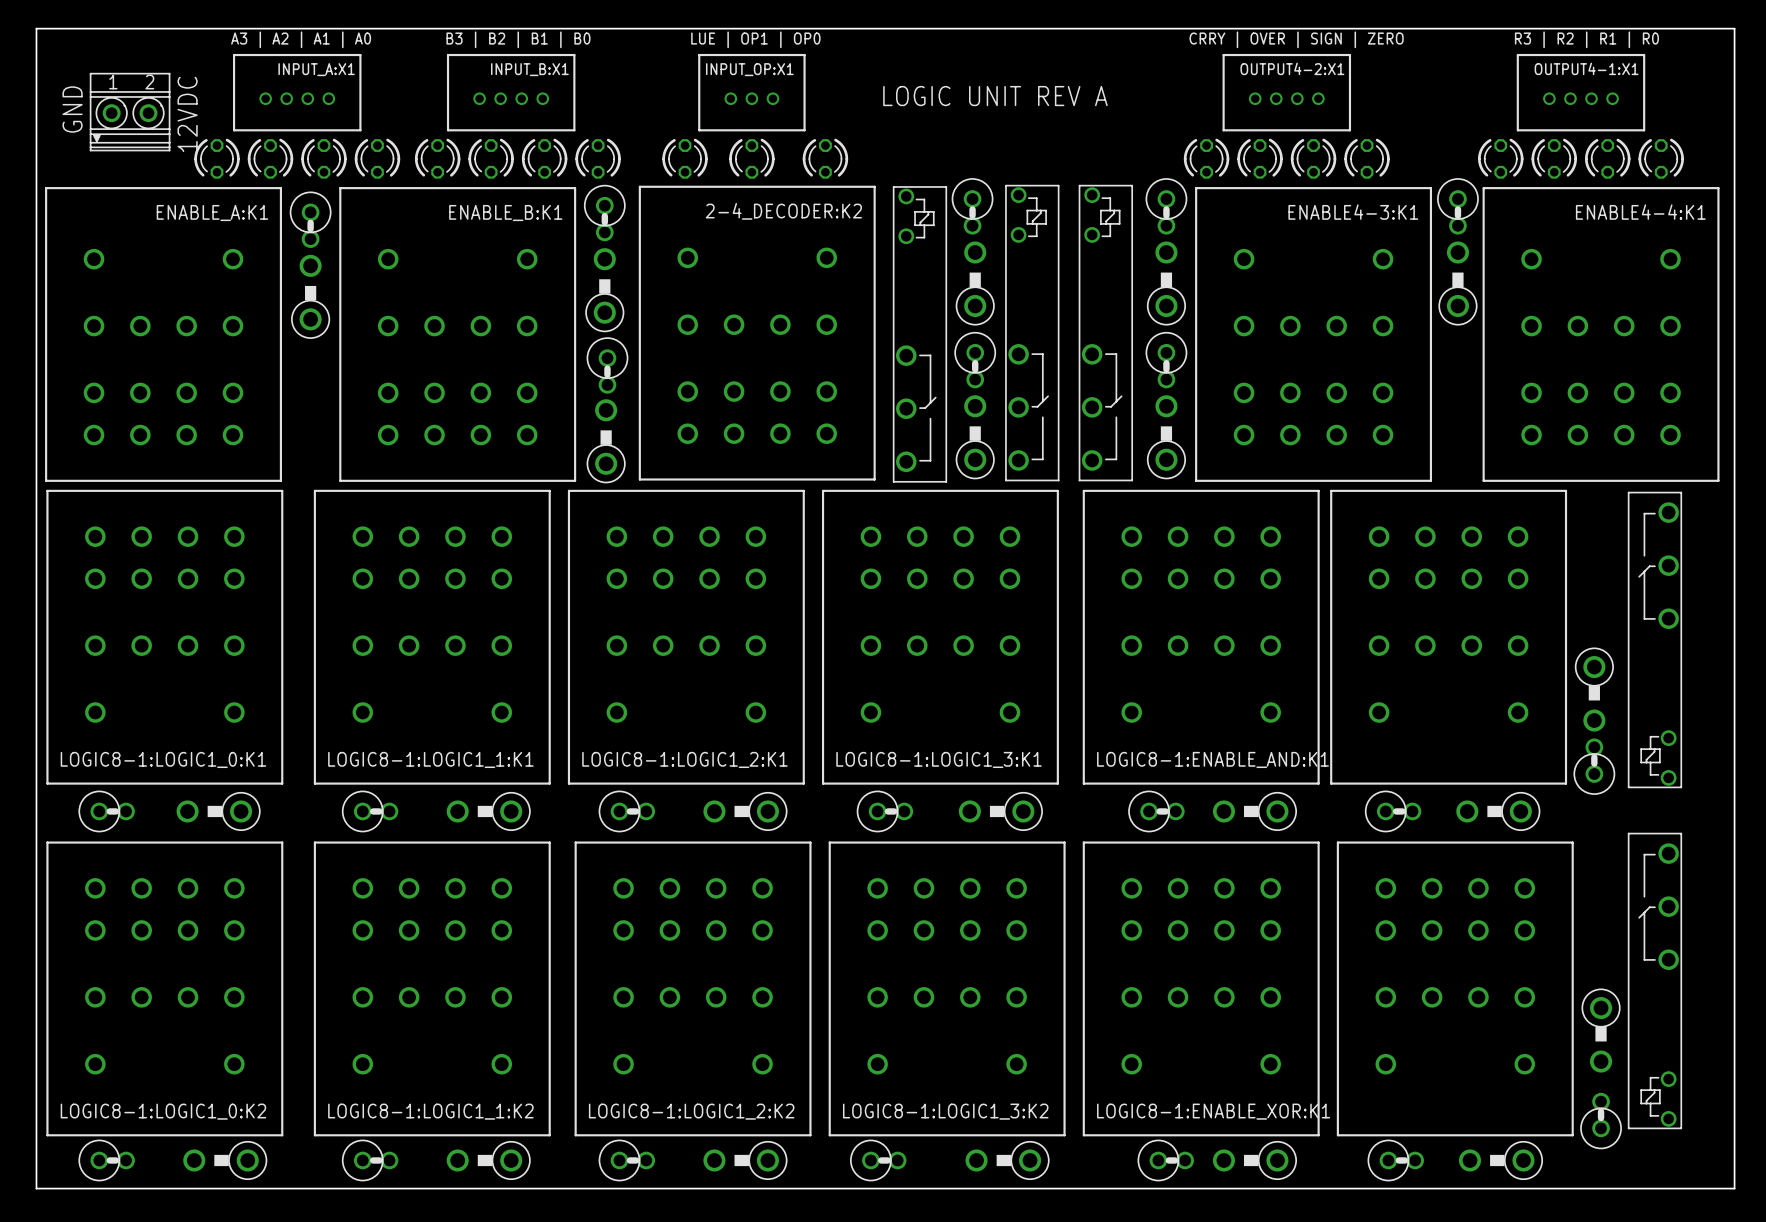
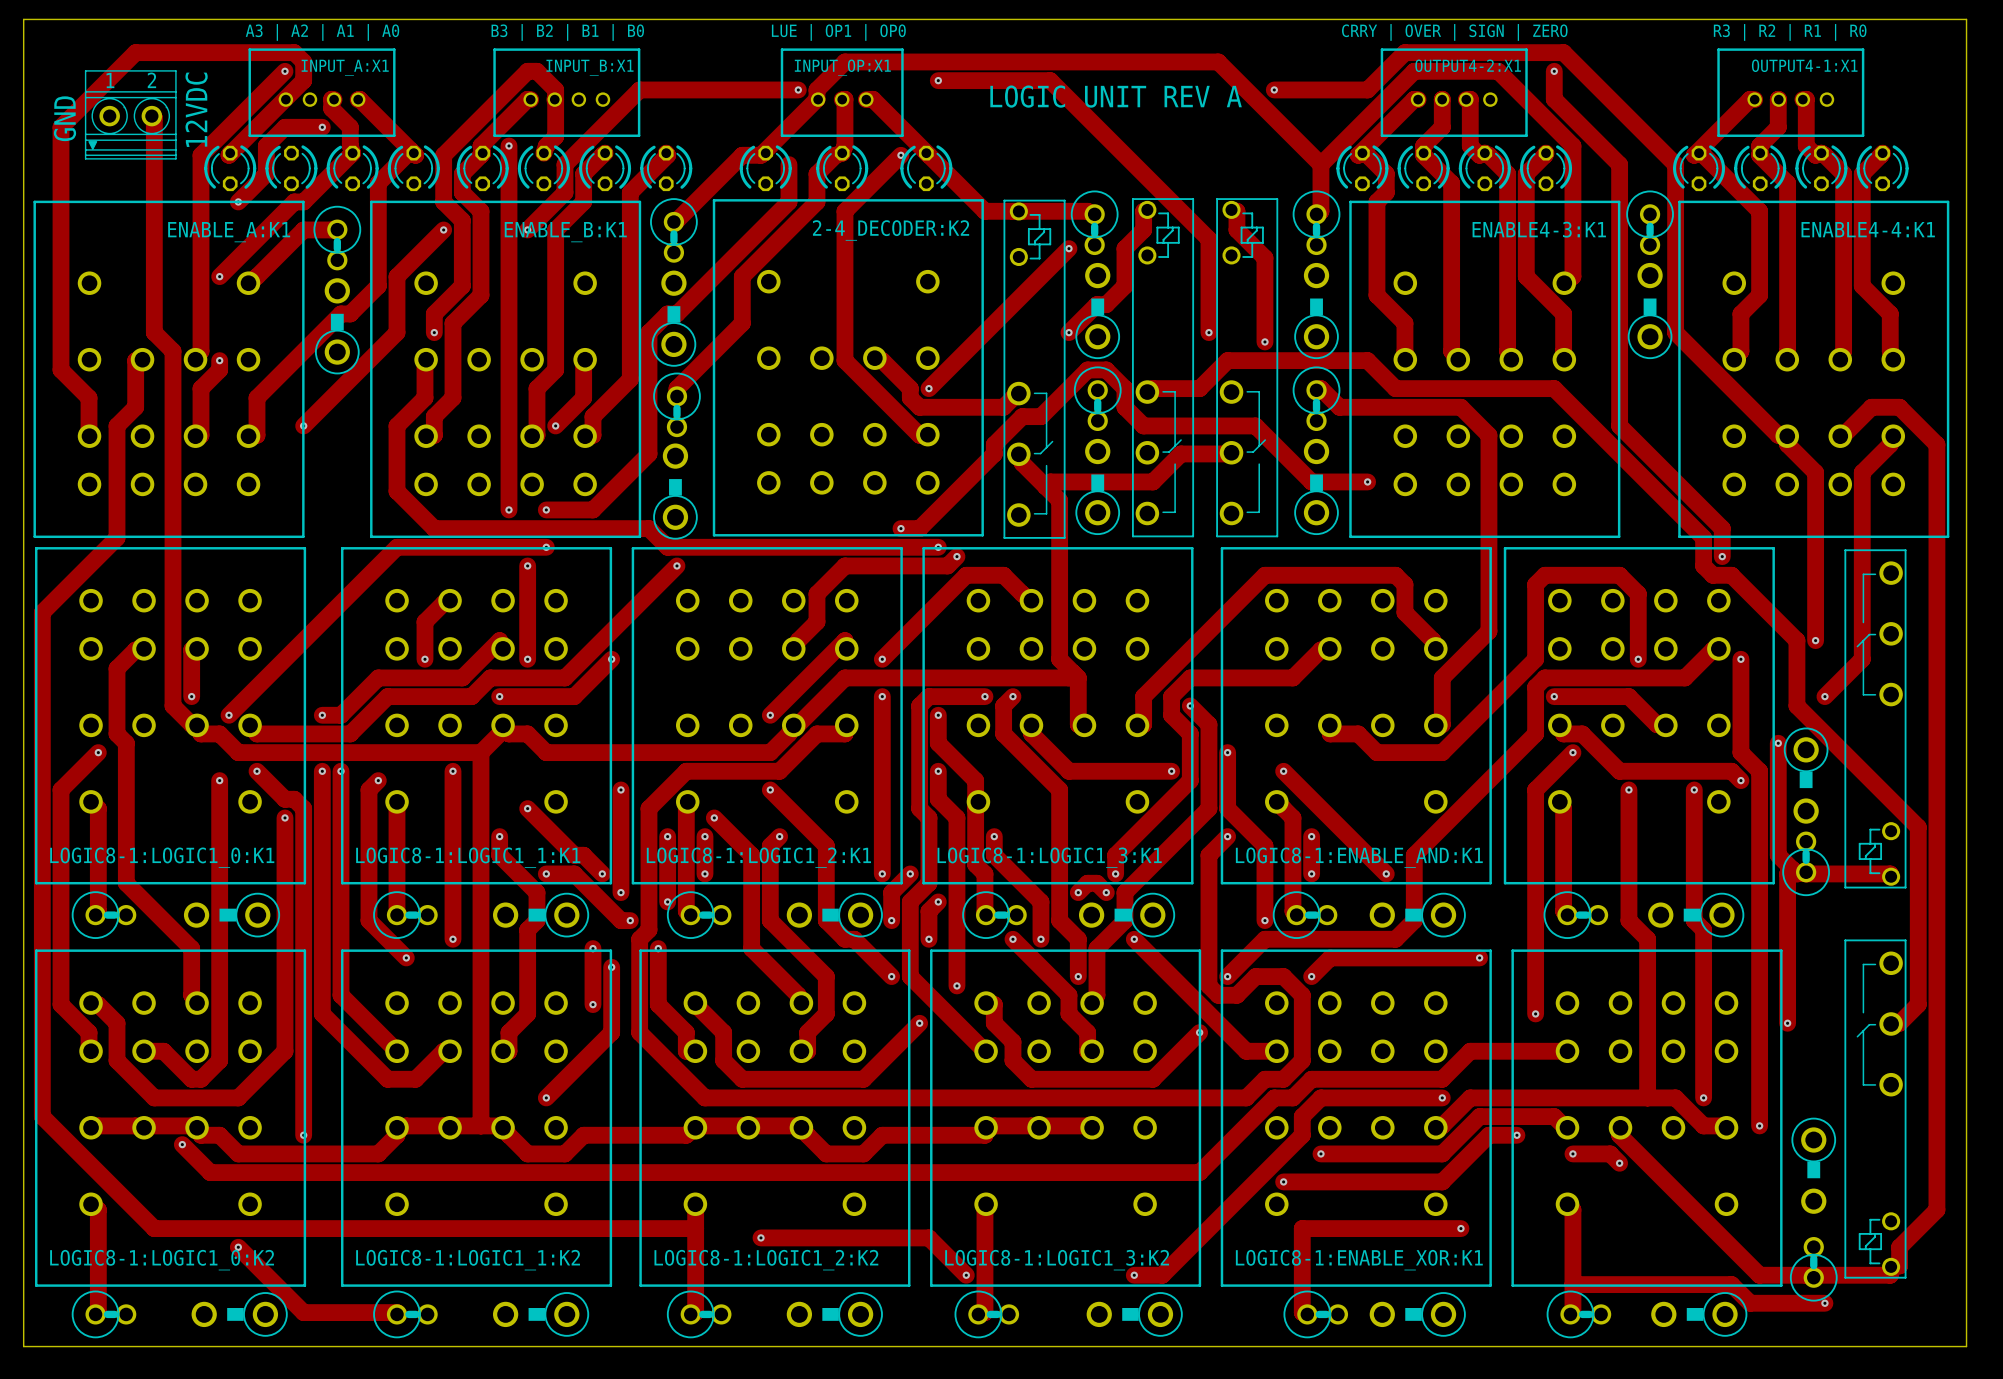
track: none -> (285, 71) (201, 155) (201, 351) (195, 359)
via: none -> (285, 71)
track: none -> (1554, 71) (1554, 99) (1619, 164) (1619, 425) (1722, 528) (1722, 556)
via: none -> (1554, 71)
track: none -> (938, 80) (1050, 80) (1208, 239) (1208, 332)
via: none -> (938, 80)
track: none -> (798, 89) (639, 89) (564, 164) (564, 192) (527, 229)
via: none -> (798, 89)
track: none -> (1274, 89) (1367, 89) (1404, 52) (1563, 52) (1675, 164) (1675, 332) (1778, 435) (1787, 436) (1787, 444) (1815, 472) (1815, 640)
via: none -> (1274, 89)
track: none -> (334, 99) (331, 99) (331, 108) (350, 127) (350, 145) (352, 153) (303, 201) (294, 201) (219, 276)
track: none -> (358, 99) (415, 155) (413, 153)
track: none -> (530, 99) (527, 99) (480, 145) (482, 153) (462, 173) (462, 192) (480, 211) (480, 295) (452, 323) (452, 397) (434, 416) (434, 435) (426, 436)
track: none -> (842, 99) (844, 99) (844, 145) (842, 153) (835, 155) (816, 173) (816, 201) (742, 276) (742, 323) (676, 388) (676, 396)
track: none -> (866, 99) (872, 99) (984, 211) (1087, 211) (1094, 214)
track: none -> (1418, 99) (1414, 99) (1358, 155) (1362, 153) (1367, 155) (1386, 173) (1386, 192) (1376, 201) (1376, 295) (1404, 323) (1405, 359)
track: none -> (1442, 99) (1442, 127) (1423, 145) (1423, 155) (1451, 183) (1451, 351) (1458, 359)
track: none -> (1466, 99) (1470, 99) (1470, 145) (1479, 155) (1484, 153) (1488, 155) (1507, 173) (1507, 351) (1511, 359)
track: none -> (1754, 99) (1750, 99) (1694, 155) (1699, 153) (1703, 155) (1759, 211) (1759, 295) (1740, 313) (1740, 351) (1734, 359)
track: none -> (1778, 99) (1778, 127) (1759, 145) (1759, 155) (1787, 183) (1787, 359)
track: none -> (1802, 99) (1806, 99) (1806, 145) (1815, 155) (1821, 153) (1824, 155) (1843, 173) (1843, 351) (1840, 359)
track: none -> (151, 116) (154, 117) (154, 332) (173, 351) (173, 705) (191, 724) (197, 725) (201, 733) (219, 733) (238, 752) (480, 752)
track: none -> (322, 127) (285, 127) (266, 145) (266, 173) (238, 201)
via: none -> (322, 127)
track: none -> (508, 145) (508, 509)
via: none -> (508, 145)
track: none -> (410, 150) (378, 183) (378, 285) (350, 313) (340, 313) (257, 397) (257, 435) (248, 436)
track: none -> (230, 153) (229, 155) (303, 80) (303, 61) (294, 52) (135, 52) (61, 127) (61, 369) (89, 397) (89, 436)
track: none -> (543, 153) (546, 145) (555, 136) (555, 89) (536, 71) (527, 71) (443, 155) (443, 201) (462, 220) (462, 285) (434, 313) (434, 332)
track: none -> (605, 153) (583, 173) (583, 201) (555, 229) (555, 369) (536, 388) (536, 435) (532, 436)
track: none -> (666, 153) (667, 155) (630, 192) (630, 379) (592, 416) (592, 435) (585, 436)
track: none -> (1546, 153) (1526, 173) (1526, 276) (1563, 313) (1564, 359)
track: none -> (1882, 153) (1862, 173) (1862, 285) (1890, 313) (1890, 351) (1893, 359)
track: none -> (900, 155) (844, 211) (844, 360) (919, 435) (927, 434)
via: none -> (900, 155)
track: none -> (788, 164) (788, 201) (676, 313) (667, 313) (648, 332) (648, 453) (592, 509) (546, 509)
track: none -> (1320, 164) (1320, 211) (1316, 214)
track: none -> (1320, 164) (1414, 71) (1498, 71) (1572, 145) (1572, 276) (1564, 283)
track: none -> (1320, 164) (1218, 61) (844, 61) (816, 89) (816, 99) (760, 155) (742, 155) (673, 222)
via: none -> (238, 201)
track: none -> (1147, 209) (1143, 211) (1143, 229) (1124, 248) (1124, 285) (1106, 304) (1096, 304) (1068, 332)
track: none -> (1231, 209) (1236, 211) (1236, 229) (1264, 257) (1264, 341)
track: none -> (337, 229) (303, 229) (248, 283)
track: none -> (443, 229) (396, 276) (396, 332) (303, 425)
via: none -> (443, 229)
via: none -> (527, 229)
track: none -> (1068, 248) (928, 388)
via: none -> (1068, 248)
via: none -> (219, 276)
via: none -> (434, 332)
via: none -> (1068, 332)
via: none -> (1208, 332)
via: none -> (1264, 341)
track: none -> (874, 358) (882, 360) (910, 388) (910, 397) (919, 407) (1003, 407) (1018, 393)
track: none -> (142, 359) (135, 360) (135, 407) (117, 425) (117, 537) (42, 612) (42, 1116) (154, 1228) (695, 1228)
track: none -> (219, 360) (219, 369) (201, 388) (201, 435) (195, 436)
via: none -> (219, 360)
track: none -> (426, 359) (424, 397) (396, 425) (396, 491) (434, 528) (648, 528) (667, 547) (938, 547)
track: none -> (585, 359) (583, 397) (555, 425)
via: none -> (928, 388)
track: none -> (1316, 390) (1320, 388) (1339, 407) (1460, 407) (1488, 435) (1488, 631) (1442, 677) (1442, 724) (1435, 725)
track: none -> (1147, 392) (1152, 388) (1199, 388) (1227, 360) (1367, 360) (1395, 388) (1554, 388) (1703, 537) (1703, 565) (1712, 575) (1731, 575) (1796, 640) (1796, 705) (1918, 827) (1918, 1004) (1899, 1023) (1891, 1023)
via: none -> (303, 425)
via: none -> (555, 425)
track: none -> (1840, 436) (1843, 435) (1871, 407) (1899, 407) (1936, 444) (1936, 1209) (1899, 1247) (1899, 1265) (1891, 1266) (1890, 1275) (1815, 1275) (1813, 1277) (1806, 1275) (1759, 1275) (1619, 1135) (1620, 1127)
track: none -> (1893, 436) (1890, 444) (1862, 472) (1862, 659) (1824, 696)
track: none -> (1231, 452) (1180, 453) (1152, 481) (1050, 481) (1045, 486)
track: none -> (1018, 454) (1022, 463) (1059, 500) (1059, 659) (1078, 677) (1078, 724) (1084, 725)
track: none -> (1367, 481) (1311, 481) (1255, 425) (1143, 425) (1124, 407) (1124, 388) (1106, 369) (1087, 369) (1040, 416) (1022, 416) (994, 444) (994, 453) (919, 528) (900, 528)
via: none -> (1367, 481)
via: none -> (508, 509)
via: none -> (546, 509)
via: none -> (900, 528)
track: none -> (546, 547) (396, 547) (229, 715)
via: none -> (546, 547)
via: none -> (938, 547)
track: none -> (956, 556) (947, 565) (844, 565) (816, 593) (816, 621) (798, 640) (793, 648)
via: none -> (956, 556)
via: none -> (1722, 556)
track: none -> (527, 565) (527, 659)
via: none -> (527, 565)
track: none -> (676, 565) (564, 677) (490, 677) (471, 696) (387, 696) (350, 733) (257, 733) (250, 725)
via: none -> (676, 565)
track: none -> (450, 600) (443, 603) (424, 621) (424, 659)
track: none -> (1031, 600) (1003, 575) (966, 575) (882, 659)
via: none -> (1815, 640)
track: none -> (144, 648) (135, 649) (117, 668) (117, 733) (126, 743) (126, 883) (191, 948) (191, 995) (197, 1003)
track: none -> (197, 648) (191, 649) (191, 696)
track: none -> (503, 648) (499, 640) (462, 677) (378, 677) (340, 715) (322, 715)
track: none -> (846, 648) (844, 640) (770, 715)
track: none -> (1329, 648) (1320, 649) (1292, 677) (1190, 677) (1171, 696) (1171, 715) (1190, 733) (1190, 780) (1115, 855) (1115, 873)
track: none -> (1435, 648) (1432, 640) (1404, 612) (1404, 584) (1395, 575) (1264, 575) (1143, 696) (1143, 724) (1137, 725)
track: none -> (1718, 648) (1712, 649) (1684, 677) (1544, 677) (1535, 687) (1535, 733) (1414, 855) (1414, 920) (1395, 939) (1264, 939) (1227, 976)
via: none -> (424, 659)
via: none -> (527, 659)
track: none -> (611, 659) (574, 696) (499, 696)
via: none -> (611, 659)
via: none -> (882, 659)
track: none -> (1638, 659) (1638, 593) (1619, 575) (1544, 575) (1535, 584) (1535, 659) (1442, 752) (1376, 752) (1358, 733) (1330, 733) (1329, 725)
via: none -> (1638, 659)
track: none -> (1740, 659) (1740, 752) (1759, 771) (1759, 1125)
via: none -> (1740, 659)
track: none -> (1073, 673) (1068, 677) (844, 677) (798, 724) (793, 725) (788, 733) (770, 752) (546, 752) (527, 733) (508, 733) (503, 725) (499, 733) (480, 752)
via: none -> (191, 696)
via: none -> (499, 696)
track: none -> (882, 696) (882, 873)
via: none -> (882, 696)
track: none -> (984, 696) (928, 696) (919, 705) (919, 808) (928, 817) (928, 883) (910, 901) (910, 976) (986, 1051)
via: none -> (984, 696)
track: none -> (1012, 696) (1003, 705) (1003, 733) (1059, 789) (1059, 920) (1078, 939) (1078, 976)
via: none -> (1012, 696)
track: none -> (1554, 696) (1628, 696) (1656, 724) (1665, 725)
via: none -> (1554, 696)
via: none -> (1824, 696)
track: none -> (1190, 705) (1208, 724) (1208, 808) (1124, 892) (1124, 920) (1096, 948) (1096, 995) (1092, 1003)
via: none -> (1190, 705)
via: none -> (229, 715)
via: none -> (322, 715)
via: none -> (770, 715)
track: none -> (938, 715) (938, 743) (975, 780) (975, 799) (978, 801) (975, 808) (975, 864) (984, 873) (986, 915)
via: none -> (938, 715)
track: none -> (846, 725) (844, 733) (816, 733) (779, 771) (686, 771) (648, 808) (648, 929) (639, 939) (639, 1032) (704, 1097) (1246, 1097) (1264, 1079) (1283, 1079) (1302, 1060) (1302, 995) (1283, 976) (1255, 976) (1236, 995) (1218, 995) (1208, 985) (1208, 855) (1227, 836)
track: none -> (1031, 725) (1031, 733) (1068, 771) (1171, 771)
track: none -> (1559, 725) (1563, 733) (1582, 733) (1619, 771) (1731, 771) (1740, 780)
track: none -> (1778, 743) (1778, 855) (1796, 873) (1806, 872) (1806, 873) (1890, 873) (1891, 876)
via: none -> (1778, 743)
track: none -> (98, 752) (61, 789) (61, 1004) (89, 1032) (89, 1051) (91, 1051)
via: none -> (98, 752)
track: none -> (480, 752) (480, 1125)
track: none -> (1227, 752) (1227, 808) (1264, 845) (1264, 920)
via: none -> (1227, 752)
track: none -> (1572, 752) (1535, 789) (1535, 1013)
via: none -> (1572, 752)
track: none -> (257, 771) (285, 799) (294, 799) (303, 808) (303, 1135)
via: none -> (257, 771)
track: none -> (322, 771) (322, 1013) (387, 1079) (415, 1079) (443, 1051) (450, 1051)
via: none -> (322, 771)
track: none -> (340, 771) (340, 995) (396, 1051)
via: none -> (340, 771)
track: none -> (452, 771) (452, 939)
via: none -> (452, 771)
track: none -> (938, 771) (938, 799) (956, 817) (956, 985)
via: none -> (938, 771)
via: none -> (1171, 771)
track: none -> (1283, 771) (1386, 873)
via: none -> (1283, 771)
track: none -> (219, 780) (219, 1060) (201, 1079) (191, 1079) (163, 1051) (144, 1051)
via: none -> (219, 780)
track: none -> (378, 780) (368, 789) (368, 920) (406, 957)
via: none -> (378, 780)
via: none -> (1740, 780)
track: none -> (620, 789) (620, 892)
via: none -> (620, 789)
track: none -> (770, 789) (826, 845) (826, 920) (844, 939) (854, 939) (891, 976)
via: none -> (770, 789)
track: none -> (1628, 789) (1628, 920) (1647, 939) (1647, 1097)
via: none -> (1628, 789)
track: none -> (1694, 789) (1694, 920) (1703, 929) (1703, 1097)
via: none -> (1694, 789)
track: none -> (91, 801) (98, 808) (98, 911) (95, 915)
track: none -> (397, 801) (396, 915)
track: none -> (687, 801) (686, 911) (690, 915)
track: none -> (1276, 801) (1292, 817) (1292, 911) (1296, 915)
track: none -> (1559, 801) (1563, 808) (1563, 911) (1567, 915)
track: none -> (527, 808) (574, 855) (583, 855) (602, 873)
via: none -> (527, 808)
track: none -> (285, 817) (285, 1051) (238, 1097) (154, 1097) (117, 1060) (117, 1023) (98, 1004) (91, 1003)
via: none -> (285, 817)
track: none -> (714, 817) (751, 855) (751, 948) (798, 995) (801, 1003)
via: none -> (714, 817)
track: none -> (499, 836) (499, 855) (536, 892) (536, 920) (527, 929) (527, 1013) (508, 1032) (508, 1051) (503, 1051)
via: none -> (499, 836)
track: none -> (667, 836) (667, 901)
via: none -> (667, 836)
track: none -> (704, 836) (704, 873)
via: none -> (704, 836)
track: none -> (779, 836) (770, 845) (770, 920) (826, 976) (826, 1013) (807, 1032) (807, 1051) (801, 1051)
via: none -> (779, 836)
track: none -> (994, 836) (994, 855) (1040, 901) (1040, 939)
via: none -> (994, 836)
via: none -> (1227, 836)
track: none -> (1311, 836) (1311, 873)
via: none -> (1311, 836)
track: none -> (1792, 869) (1787, 873) (1787, 1023)
track: none -> (546, 873) (574, 873) (620, 920) (630, 920)
via: none -> (546, 873)
via: none -> (602, 873)
via: none -> (704, 873)
via: none -> (882, 873)
track: none -> (910, 873) (891, 892) (891, 920)
via: none -> (910, 873)
via: none -> (1115, 873)
via: none -> (1311, 873)
via: none -> (1386, 873)
via: none -> (620, 892)
track: none -> (1078, 892) (1087, 883) (1096, 883) (1106, 892)
via: none -> (1078, 892)
via: none -> (1106, 892)
via: none -> (667, 901)
track: none -> (938, 901) (928, 911) (928, 939)
via: none -> (938, 901)
via: none -> (630, 920)
via: none -> (891, 920)
via: none -> (1264, 920)
via: none -> (452, 939)
via: none -> (928, 939)
track: none -> (1012, 939) (1068, 995) (1068, 1013) (1087, 1032) (1087, 1051) (1092, 1051)
via: none -> (1012, 939)
via: none -> (1040, 939)
track: none -> (1134, 939) (1246, 1051) (1276, 1051)
via: none -> (1134, 939)
track: none -> (592, 948) (592, 1004)
via: none -> (592, 948)
track: none -> (658, 948) (658, 1004) (686, 1032) (686, 1051) (695, 1051)
via: none -> (658, 948)
via: none -> (406, 957)
track: none -> (1479, 957) (1330, 957) (1311, 976)
via: none -> (1479, 957)
track: none -> (611, 967) (611, 1032) (546, 1097)
via: none -> (611, 967)
via: none -> (891, 976)
via: none -> (1078, 976)
via: none -> (1227, 976)
via: none -> (1311, 976)
via: none -> (956, 985)
track: none -> (695, 1003) (723, 1032) (723, 1060) (742, 1079) (863, 1079) (919, 1023)
track: none -> (986, 1003) (994, 1004) (994, 1023) (1012, 1041) (1012, 1060) (1031, 1079) (1152, 1079) (1199, 1032)
via: none -> (592, 1004)
via: none -> (1535, 1013)
via: none -> (919, 1023)
via: none -> (1787, 1023)
via: none -> (1199, 1032)
track: none -> (1567, 1051) (1470, 1051) (1442, 1079) (1311, 1079) (1292, 1097) (1274, 1097) (1199, 1172) (210, 1172) (182, 1144)
via: none -> (546, 1097)
track: none -> (1442, 1097) (1320, 1097) (1302, 1116) (1302, 1135) (1162, 1275) (1134, 1275)
via: none -> (1442, 1097)
via: none -> (1703, 1097)
via: none -> (1759, 1125)
track: none -> (91, 1127) (98, 1125) (144, 1127) (145, 1125) (191, 1125) (197, 1127) (201, 1135) (219, 1135) (238, 1153) (378, 1153) (396, 1135) (397, 1127) (406, 1125) (443, 1125) (450, 1127) (452, 1125) (499, 1125) (527, 1153) (564, 1153) (583, 1135) (686, 1135) (695, 1125) (742, 1125) (748, 1127) (751, 1125) (798, 1125) (826, 1153) (863, 1153) (882, 1135) (984, 1135) (986, 1127) (994, 1125) (1031, 1125) (1039, 1127) (1040, 1125) (1087, 1125) (1092, 1127)
track: none -> (1435, 1127) (1442, 1125) (1470, 1097) (1675, 1097) (1703, 1125) (1726, 1127)
track: none -> (1567, 1127) (1554, 1116) (1479, 1116) (1442, 1153) (1320, 1153)
via: none -> (303, 1135)
track: none -> (1516, 1135) (1488, 1135) (1442, 1181) (1283, 1181)
via: none -> (1516, 1135)
via: none -> (182, 1144)
via: none -> (1320, 1153)
track: none -> (1572, 1153) (1610, 1153) (1619, 1163)
via: none -> (1572, 1153)
via: none -> (1619, 1163)
via: none -> (1283, 1181)
track: none -> (91, 1204) (98, 1209) (98, 1312) (95, 1314)
track: none -> (695, 1204) (695, 1312) (690, 1314)
track: none -> (986, 1204) (984, 1312) (978, 1314)
track: none -> (1567, 1204) (1572, 1209) (1572, 1312) (1570, 1314)
track: none -> (1460, 1228) (1302, 1228) (1302, 1312) (1307, 1314)
via: none -> (1460, 1228)
track: none -> (760, 1237) (928, 1237) (966, 1275)
via: none -> (760, 1237)
track: none -> (238, 1247) (303, 1312) (396, 1312) (396, 1314)
via: none -> (238, 1247)
via: none -> (966, 1275)
via: none -> (1134, 1275)
track: none -> (1572, 1284) (1731, 1284) (1750, 1303) (1824, 1303)
via: none -> (1824, 1303)

